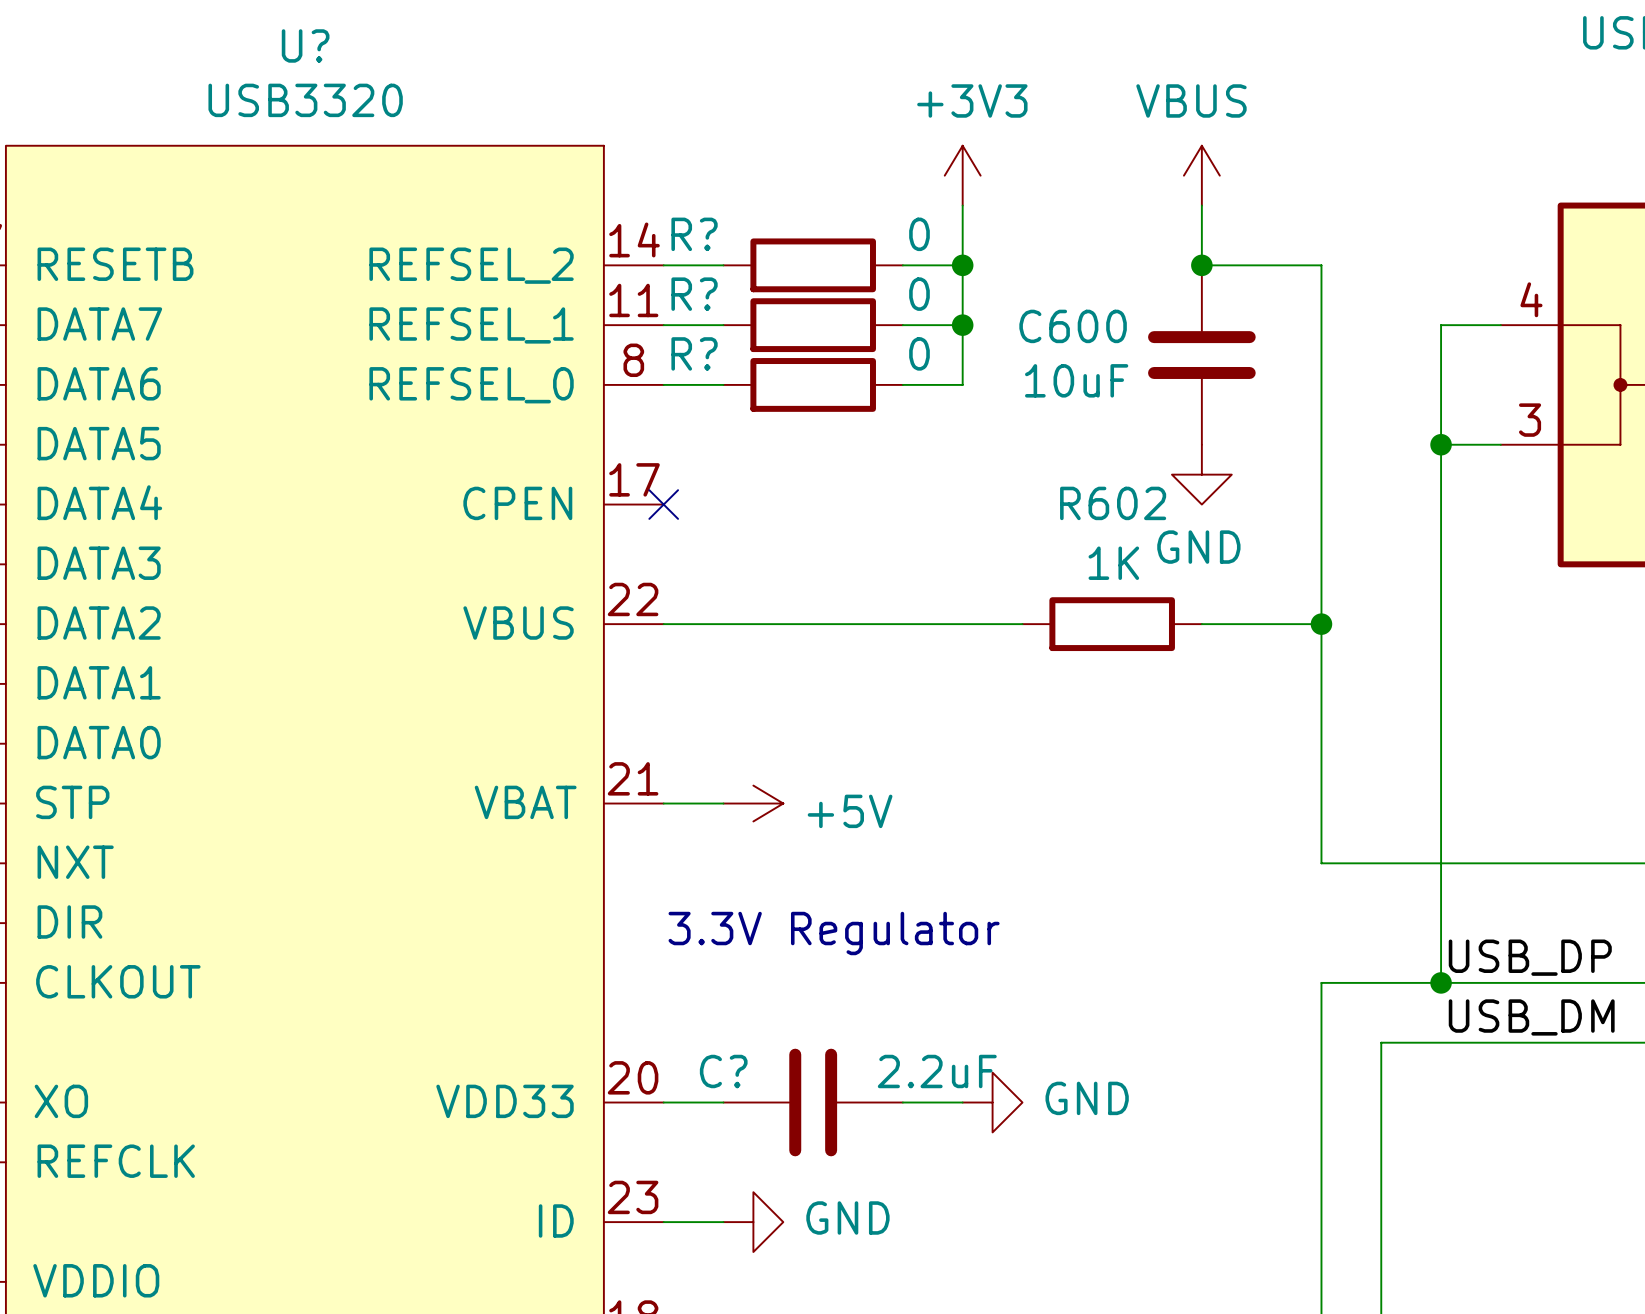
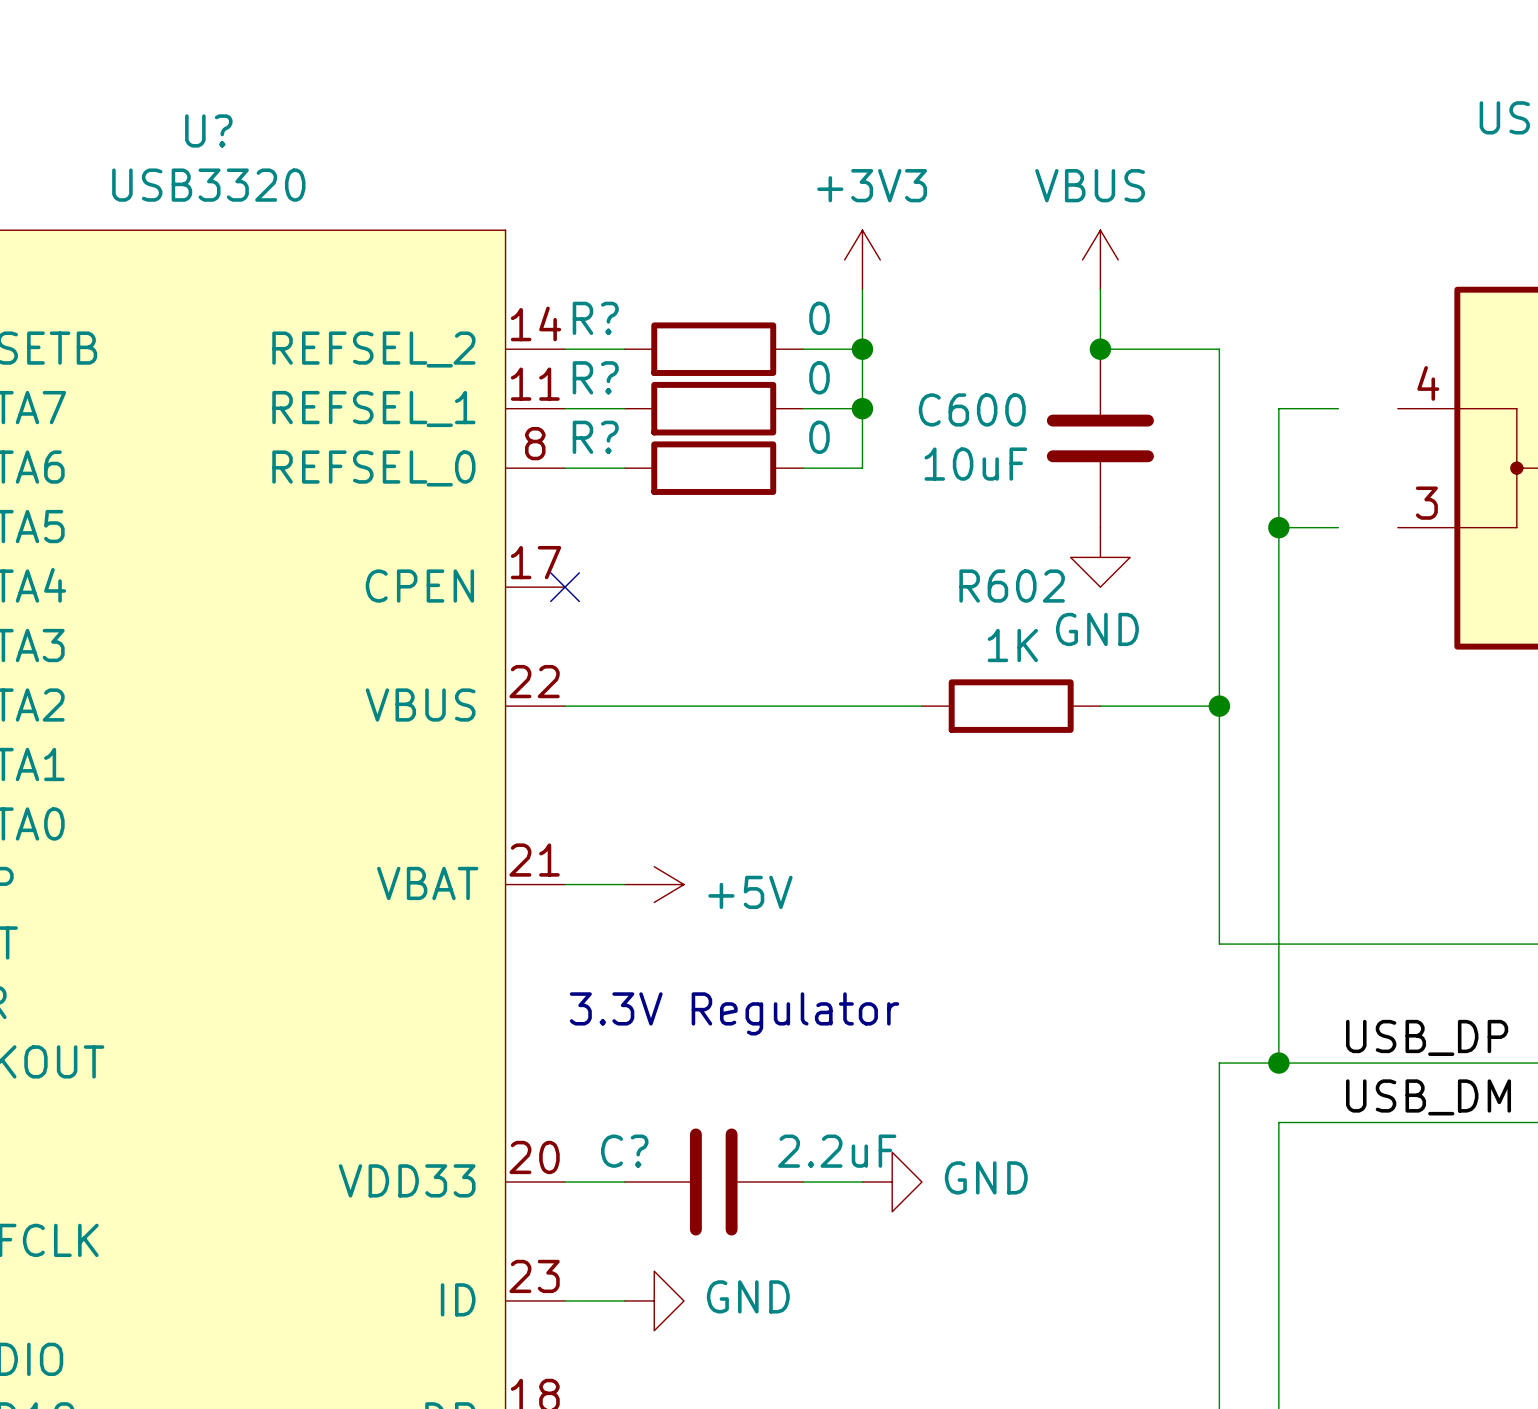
wire: (1500, 325) (1441, 325) (1441, 982) -> (1338, 408) (1278, 408) (1278, 1063)
wire: (1441, 444) (1500, 444) -> (1338, 527) (1278, 527)
junction position: (1441, 444) -> (1278, 527)
junction position: (1441, 982) -> (1278, 1063)

